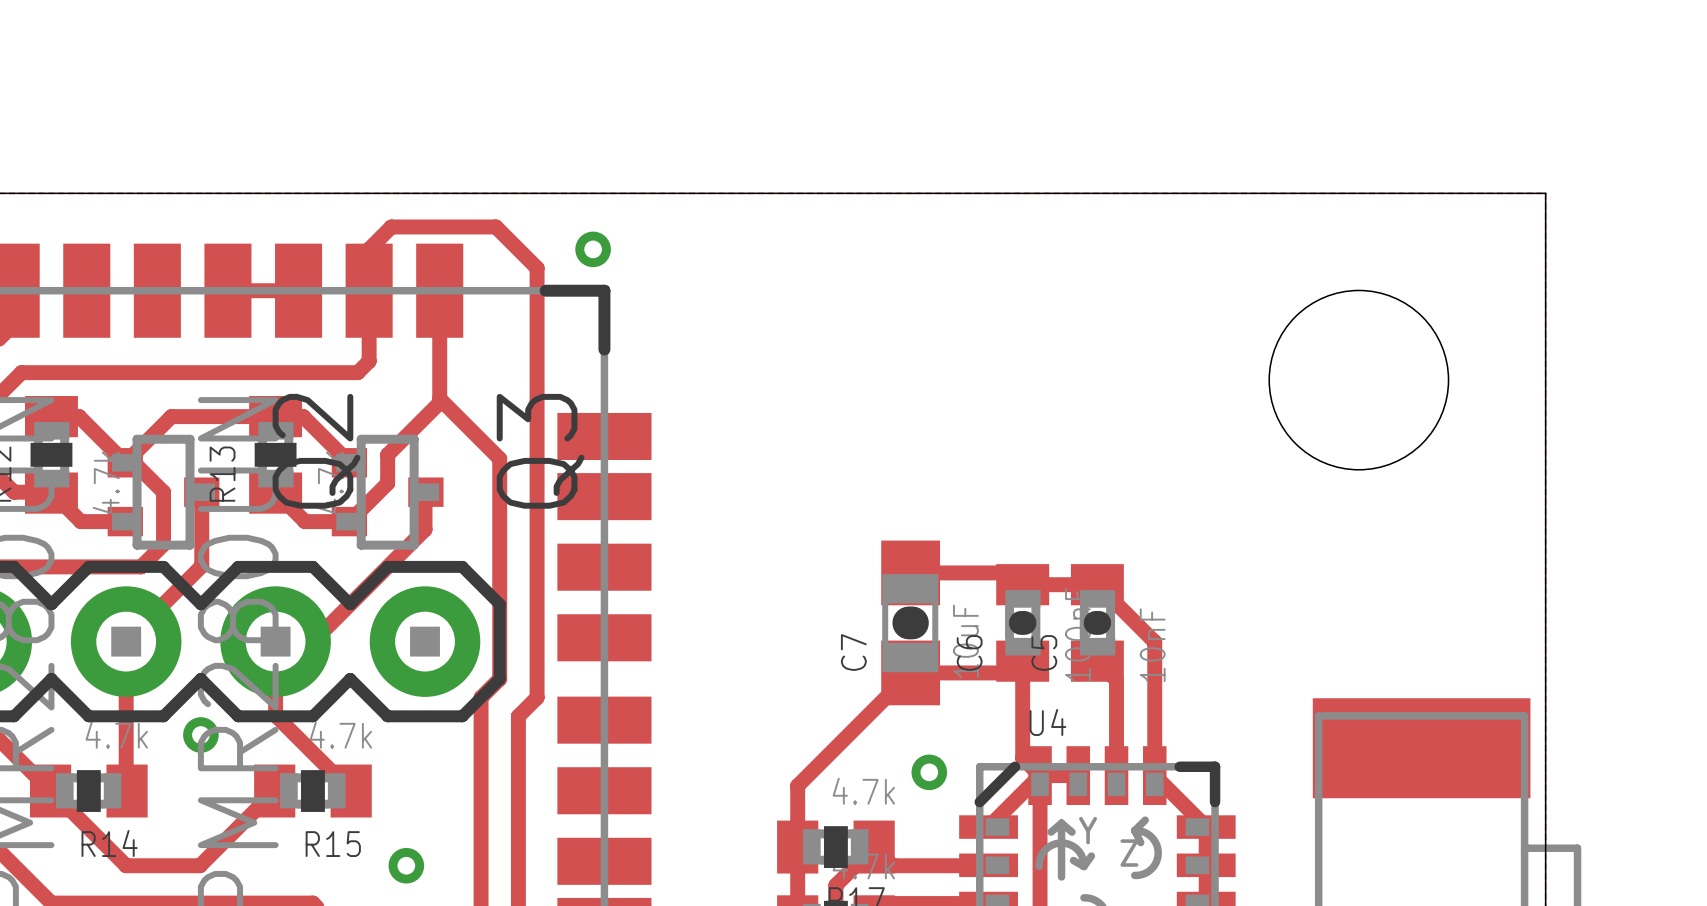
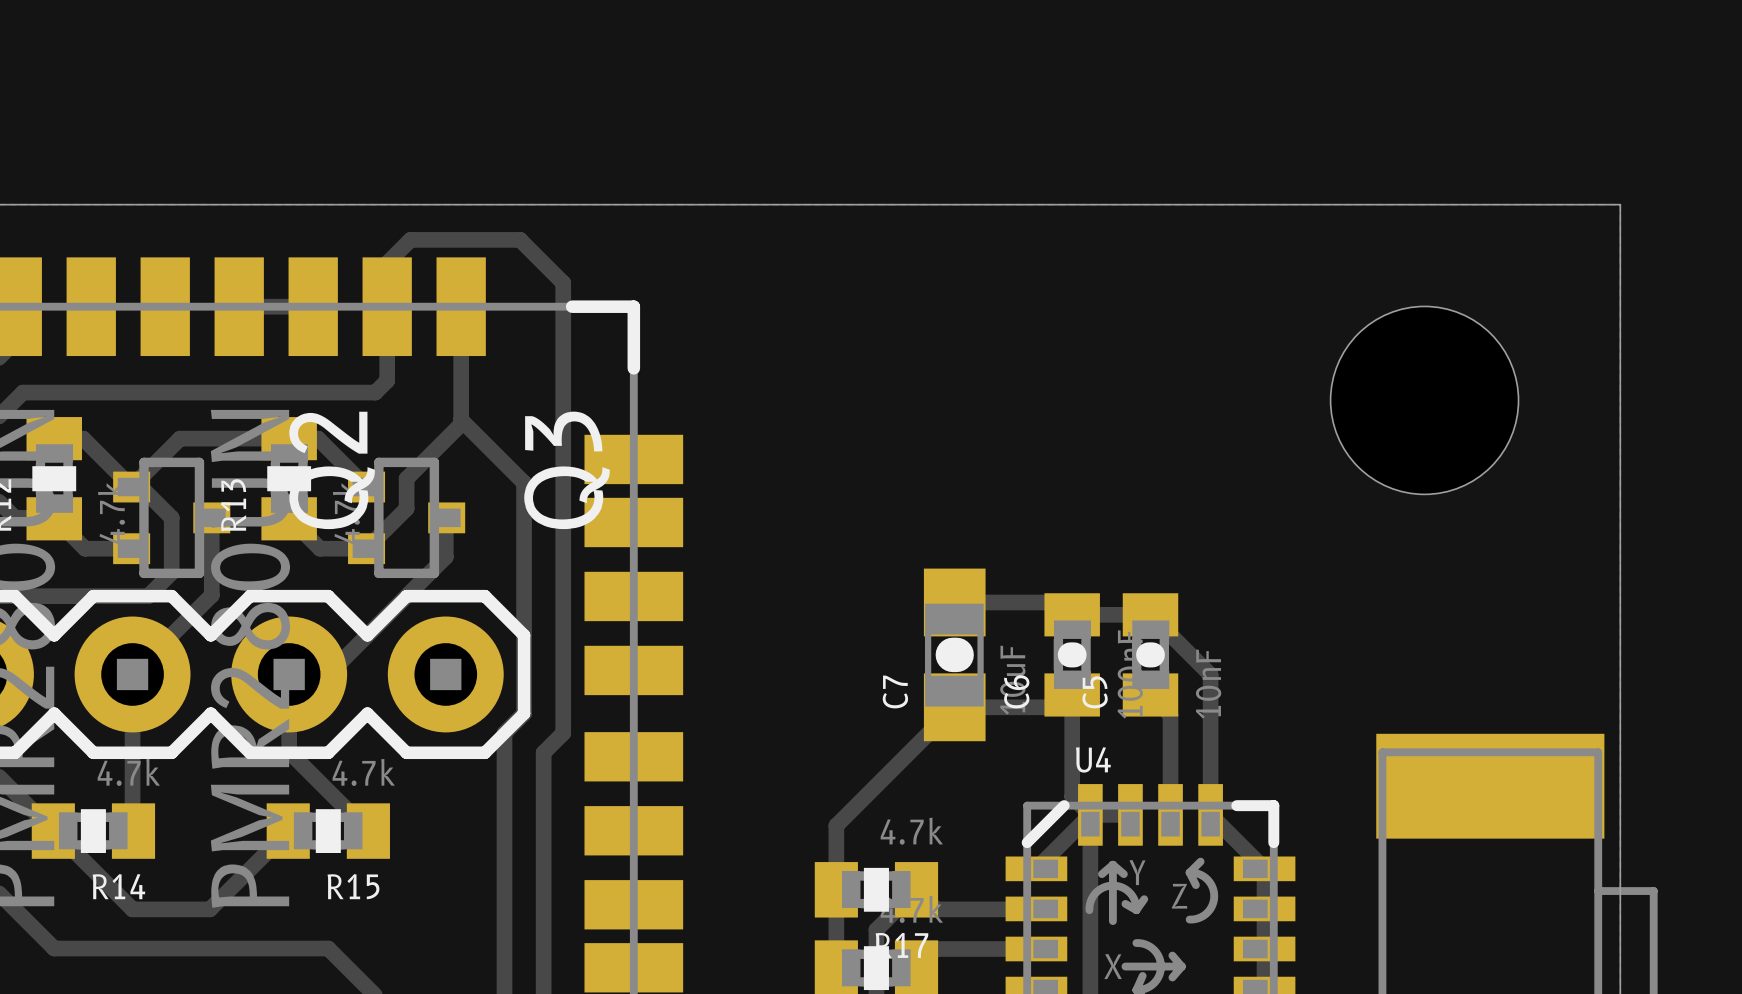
via: (593, 249) -> none
via: (200, 734) -> none
via: (929, 772) -> none
via: (406, 865) -> none

